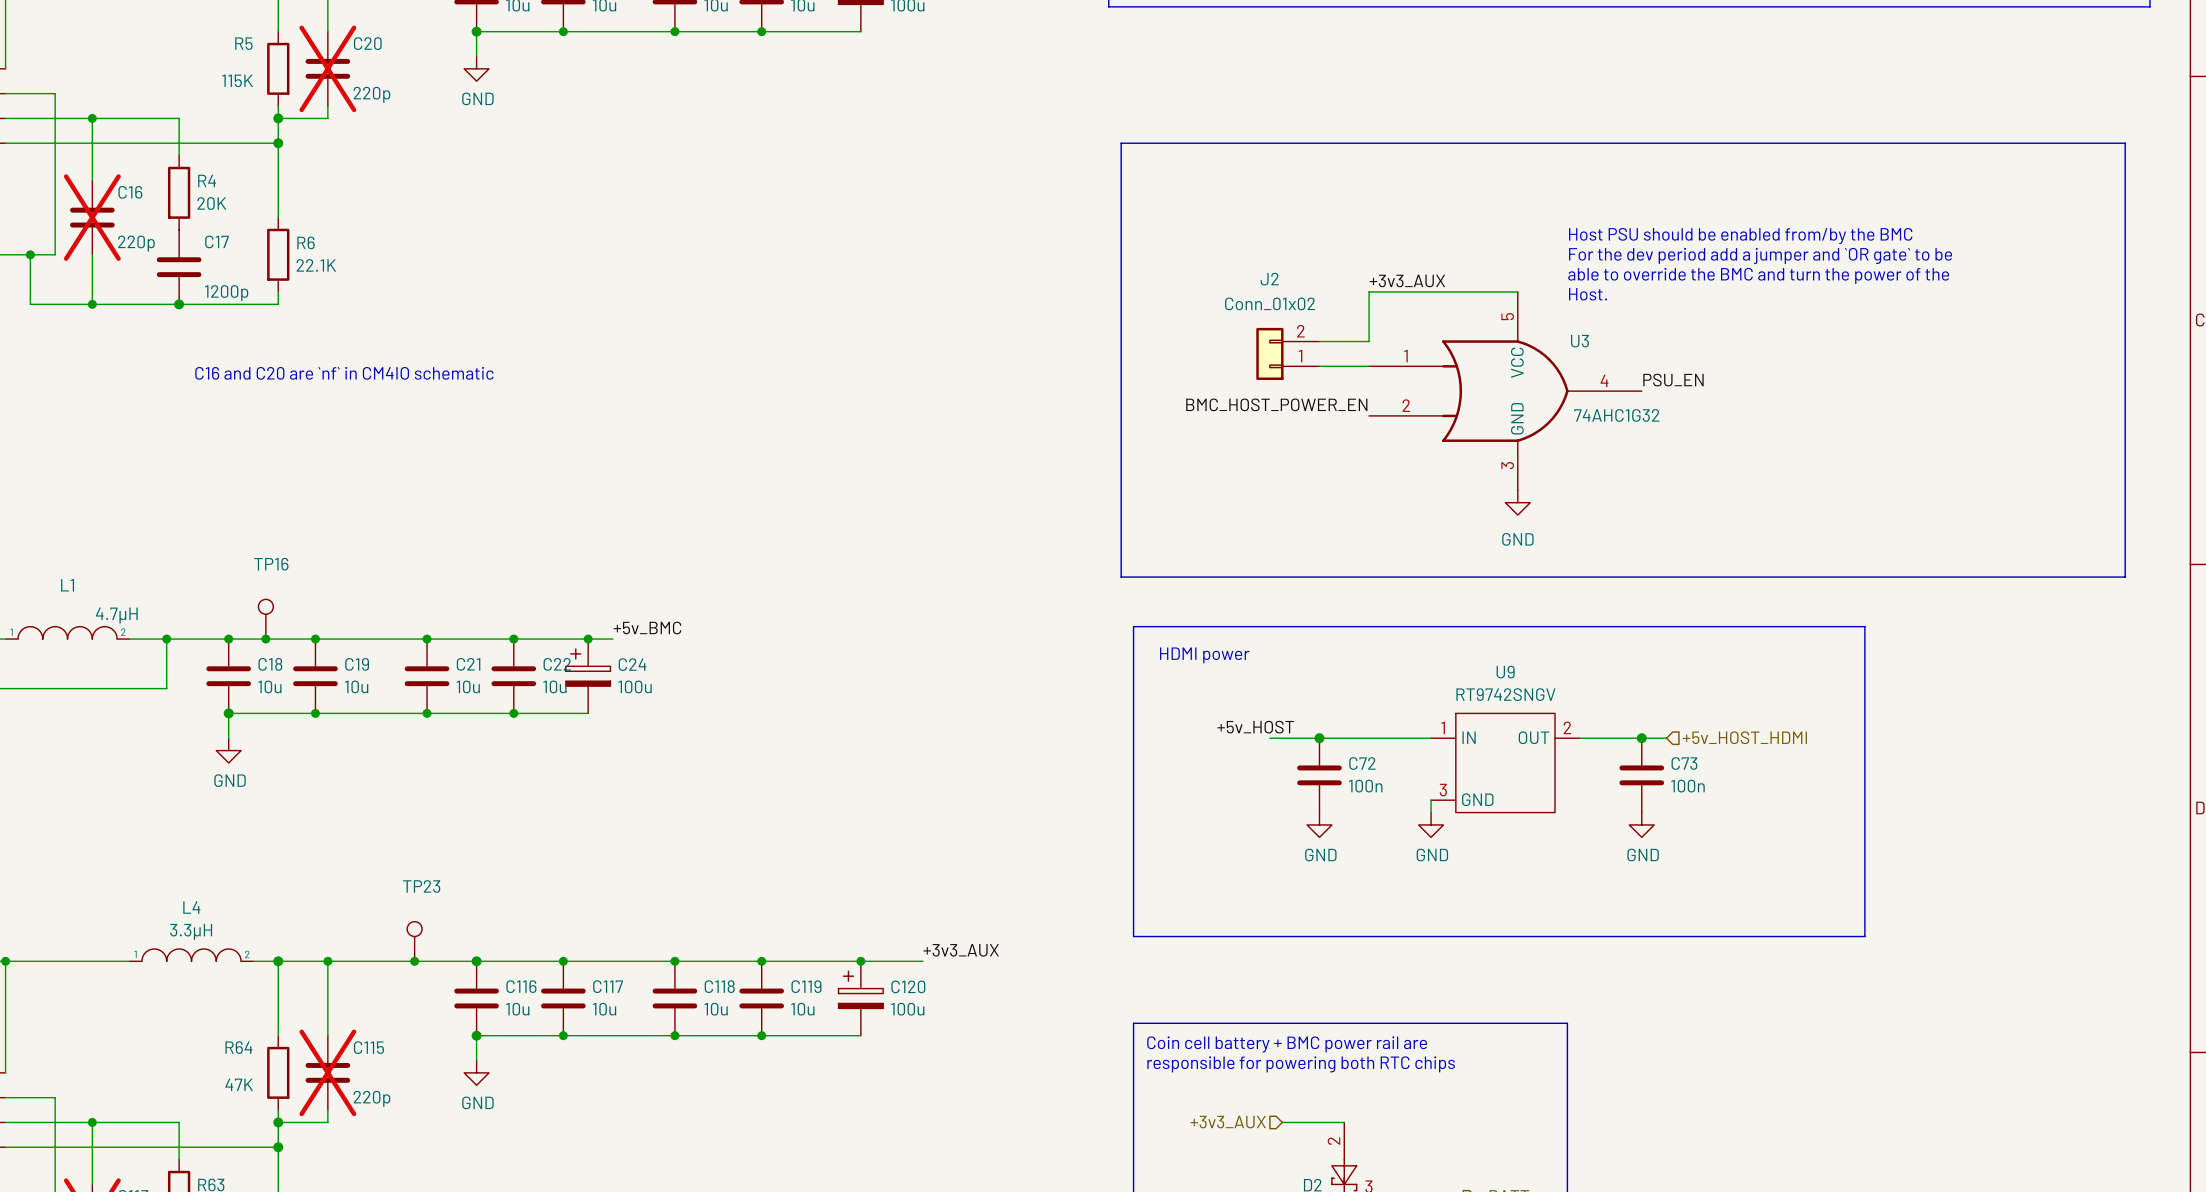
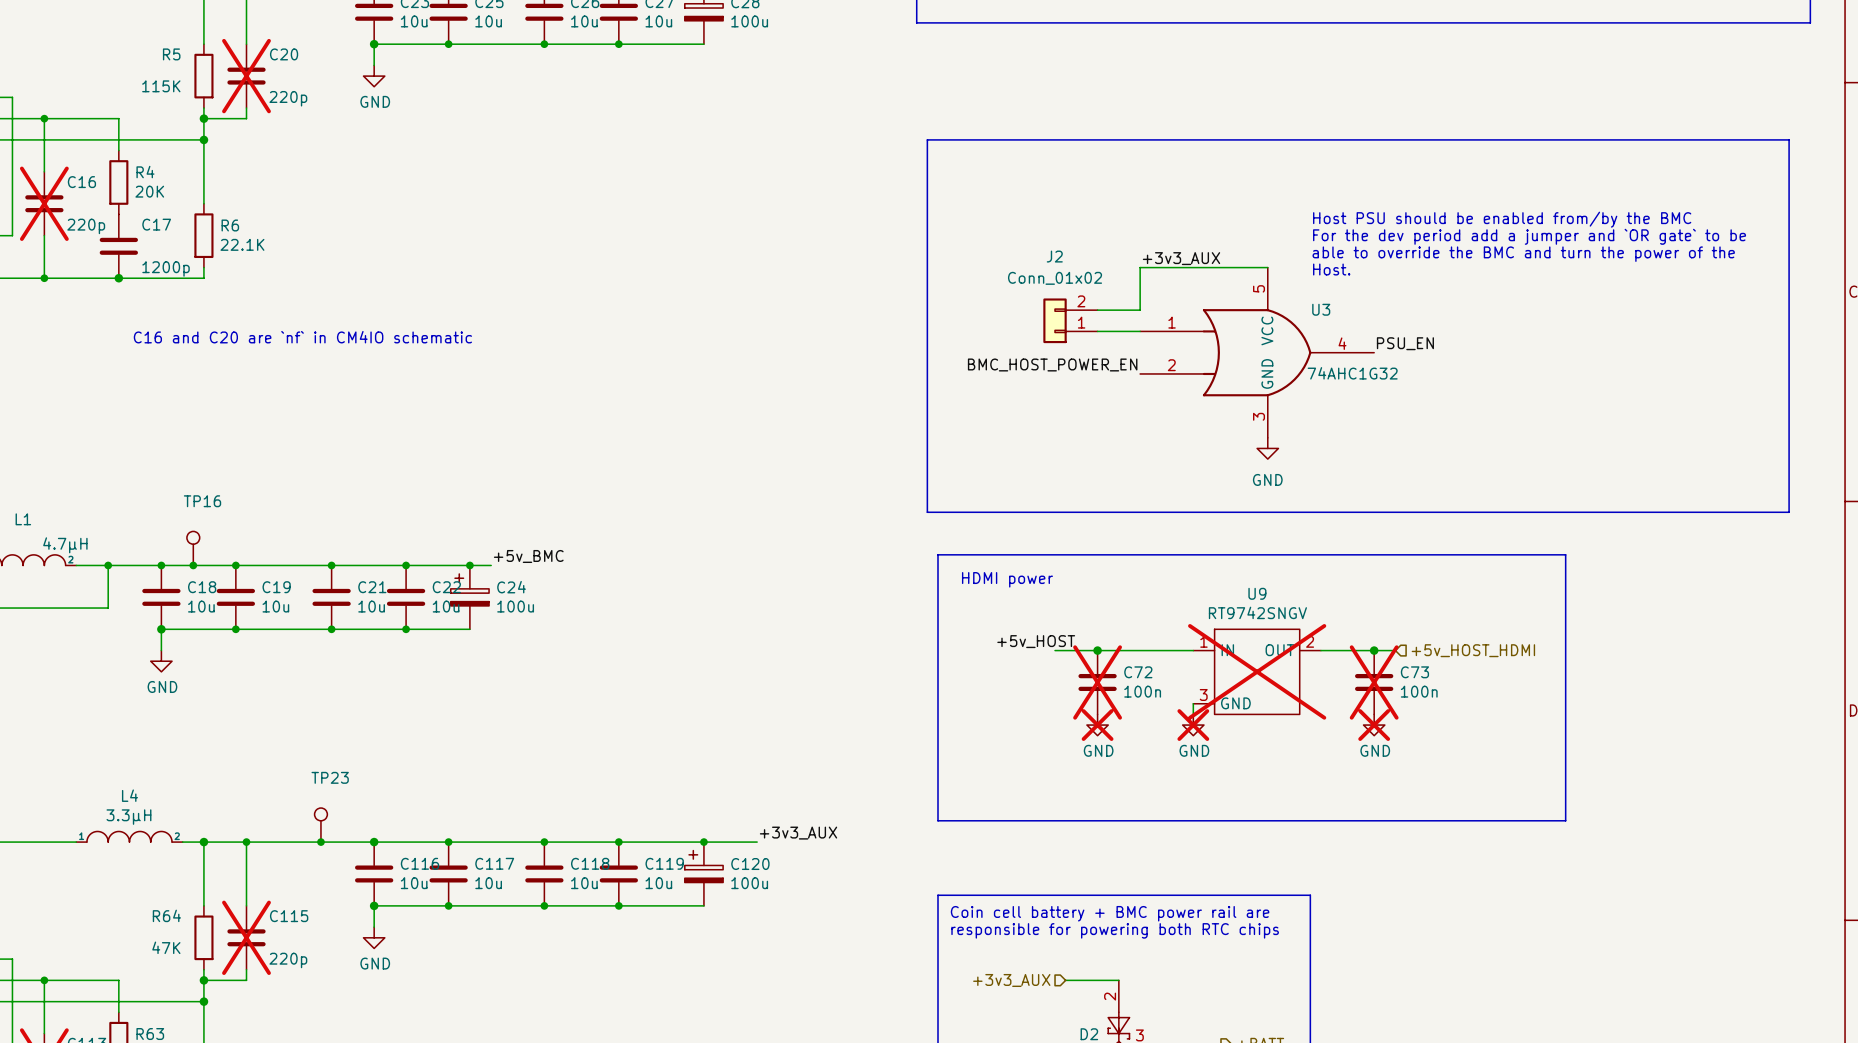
U9 do-not-place cross: none -> (1257, 671)
C72 do-not-place cross: none -> (1097, 682)
C73 do-not-place cross: none -> (1374, 682)
power symbol do-not-place cross: none -> (1097, 725)
power symbol do-not-place cross: none -> (1193, 725)
power symbol do-not-place cross: none -> (1374, 725)

